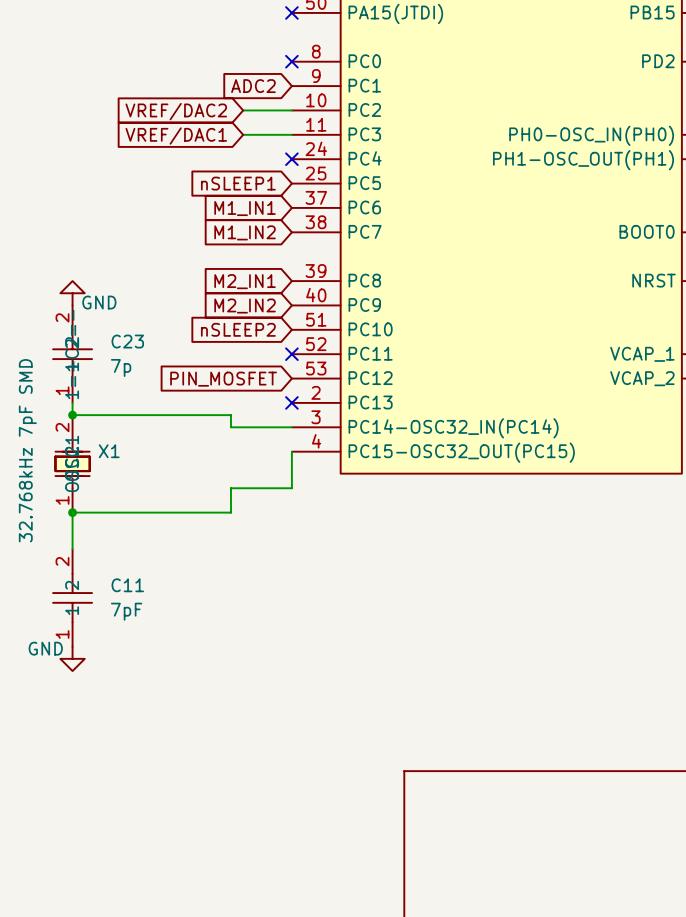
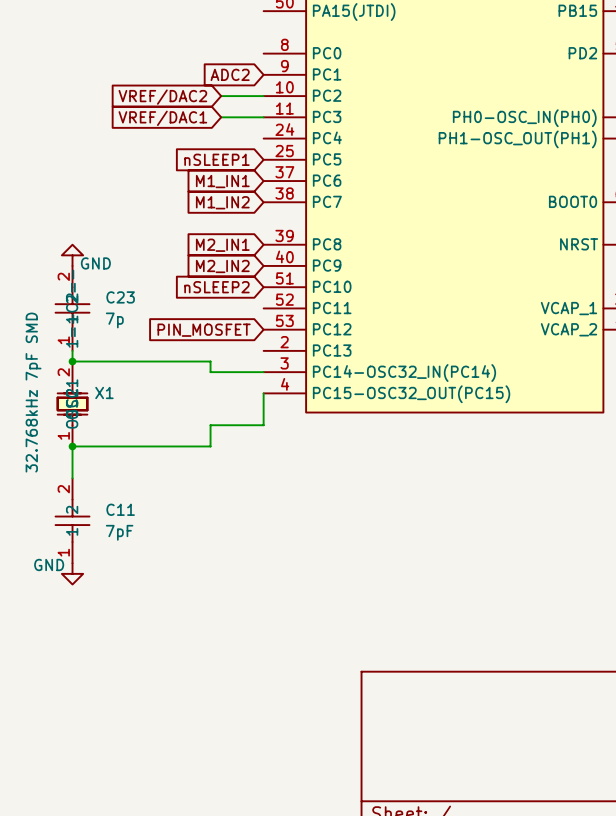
no-connect mark: (291, 12) -> none
no-connect mark: (291, 61) -> none
no-connect mark: (291, 159) -> none
no-connect mark: (291, 354) -> none
no-connect mark: (291, 402) -> none

